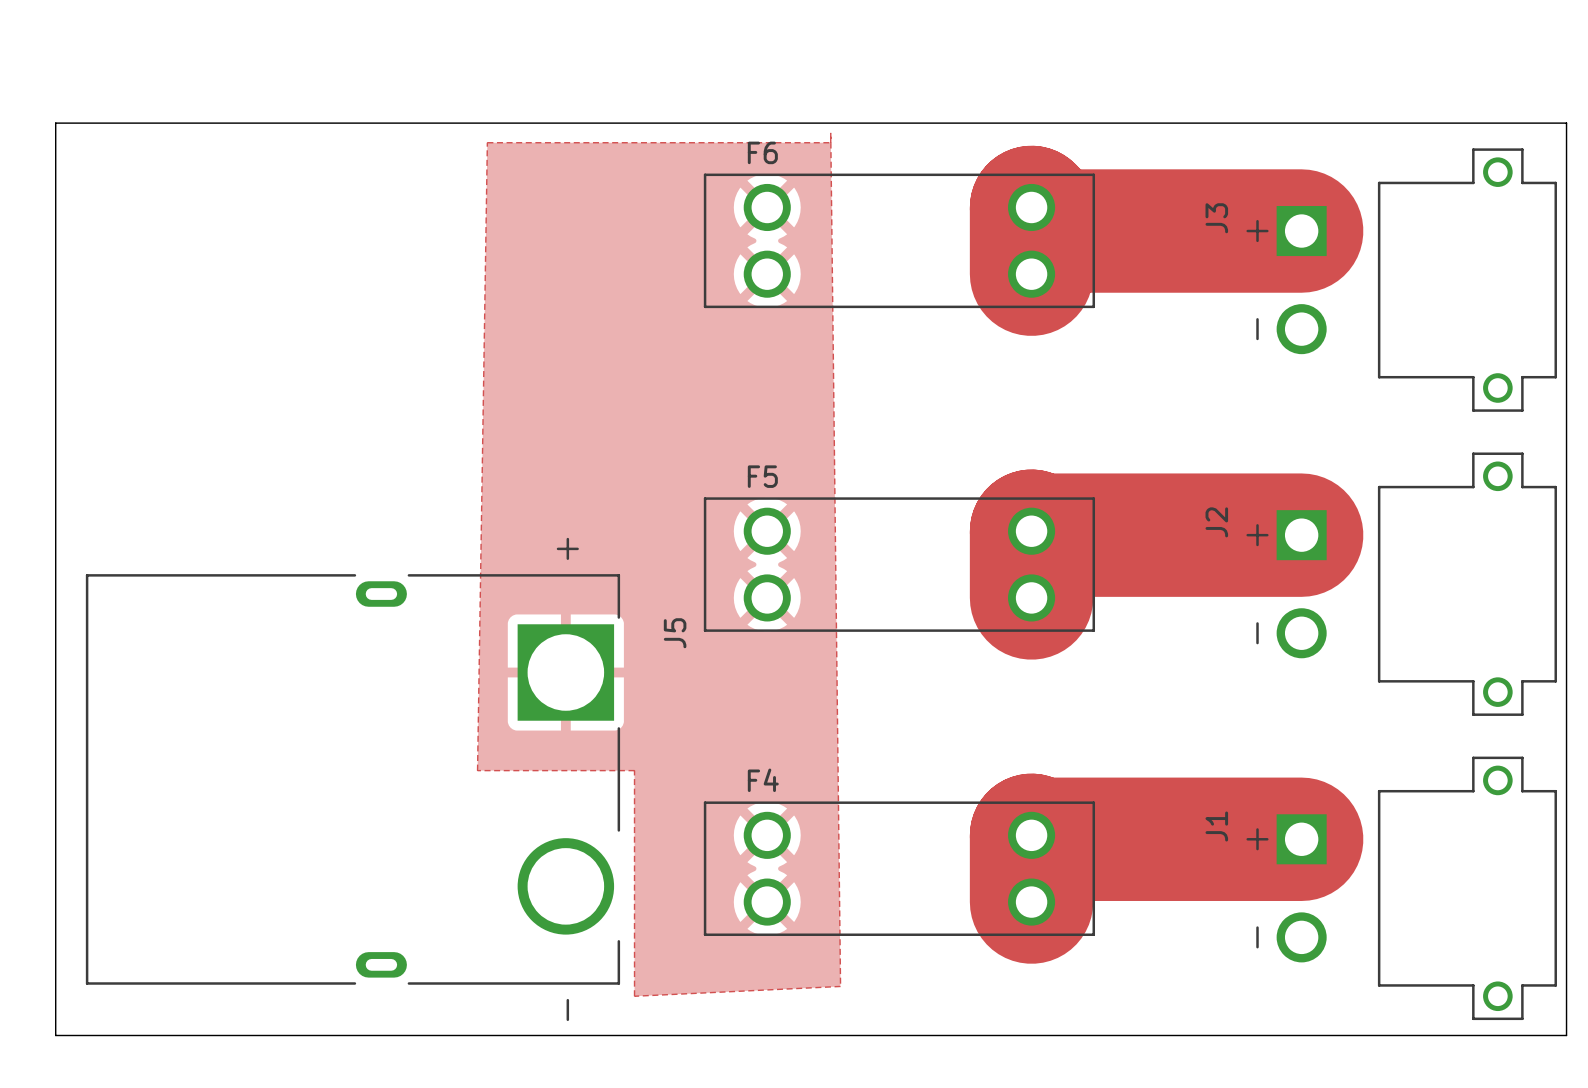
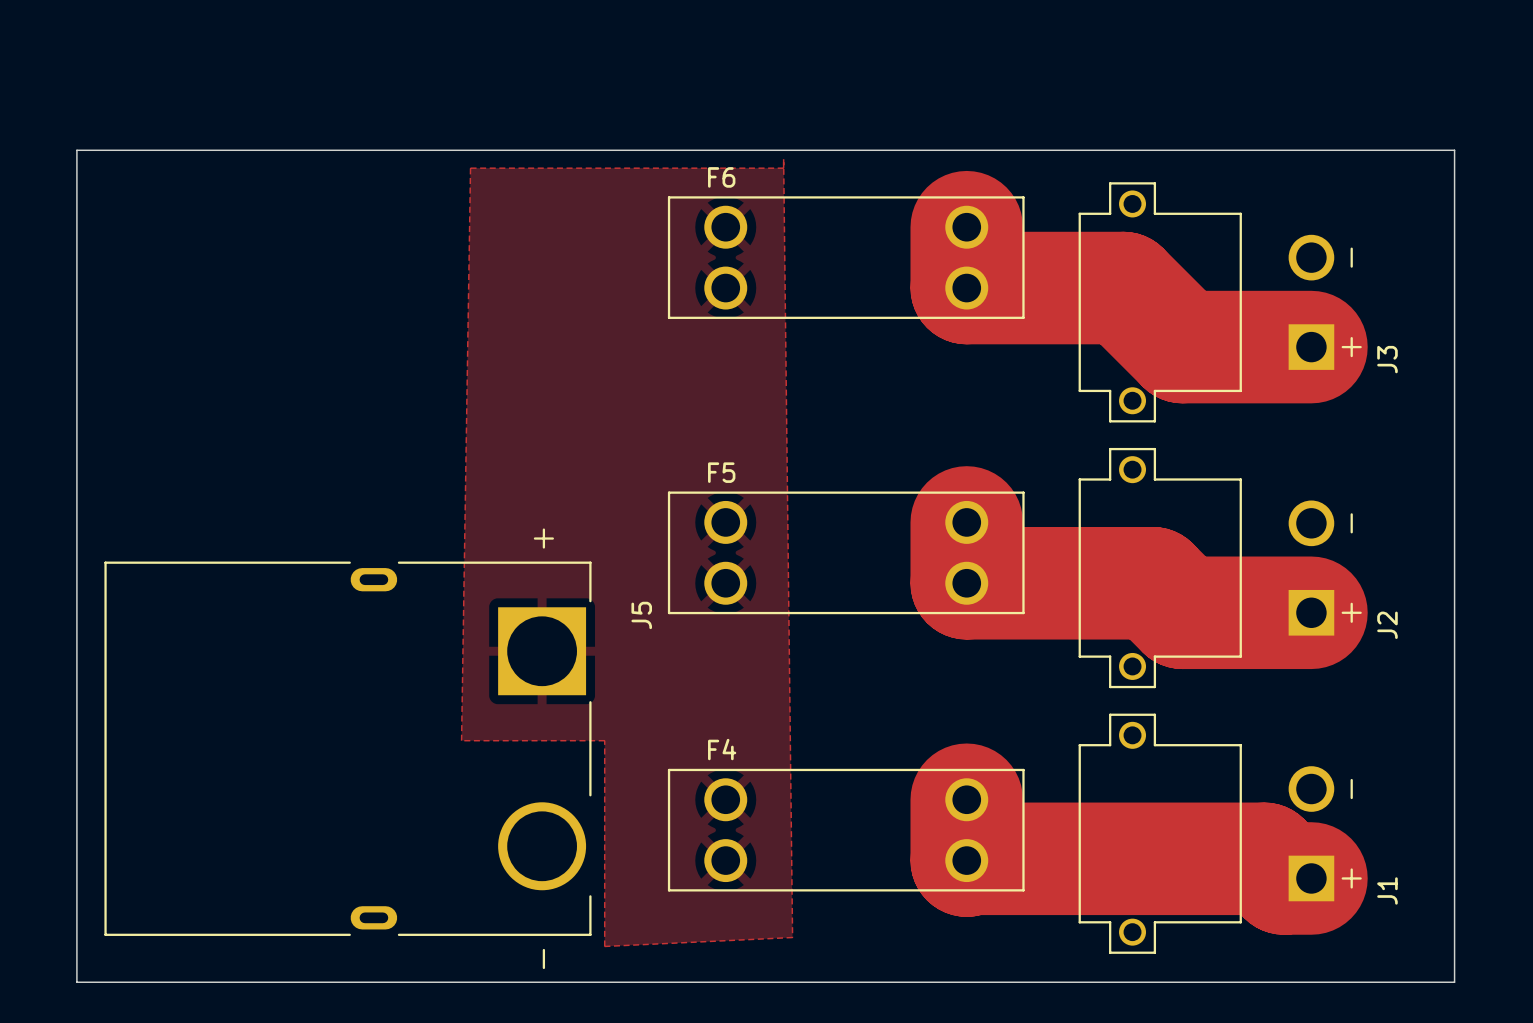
track: (1031, 207) (1055, 231) (1301, 231) -> none
track: none -> (966, 288) (1123, 288) (1182, 347) (1311, 347)
J3 rotation: 0° (1401, 280) -> 180° (1220, 302)
track: (1031, 531) (1035, 535) (1301, 535) -> none
J2 rotation: 0° (1401, 584) -> 180° (1220, 568)
track: none -> (966, 583) (1153, 583) (1182, 612) (1311, 612)
track: (1031, 835) (1035, 839) (1301, 839) -> none
J1 rotation: 0° (1401, 888) -> 180° (1220, 833)
track: none -> (966, 860) (968, 858) (1264, 858) (1284, 878) (1311, 878)

